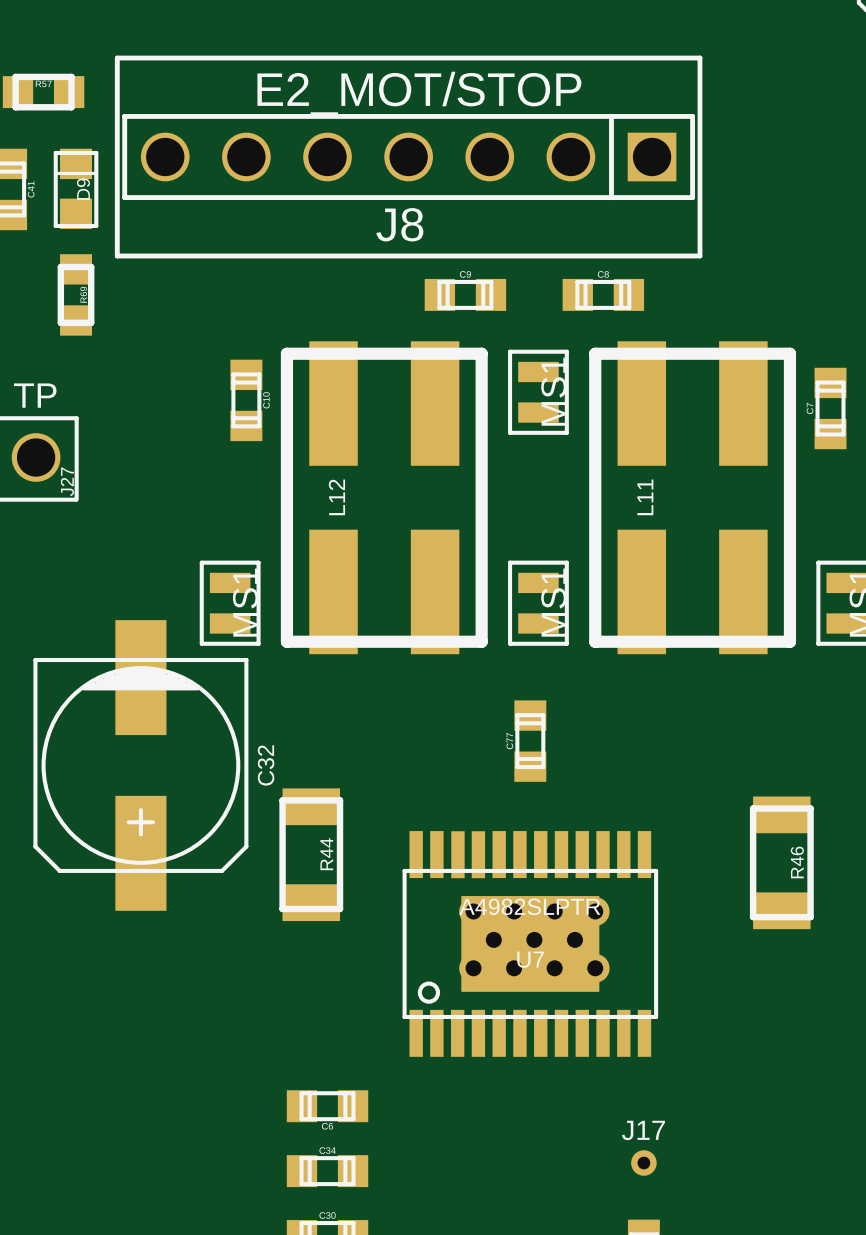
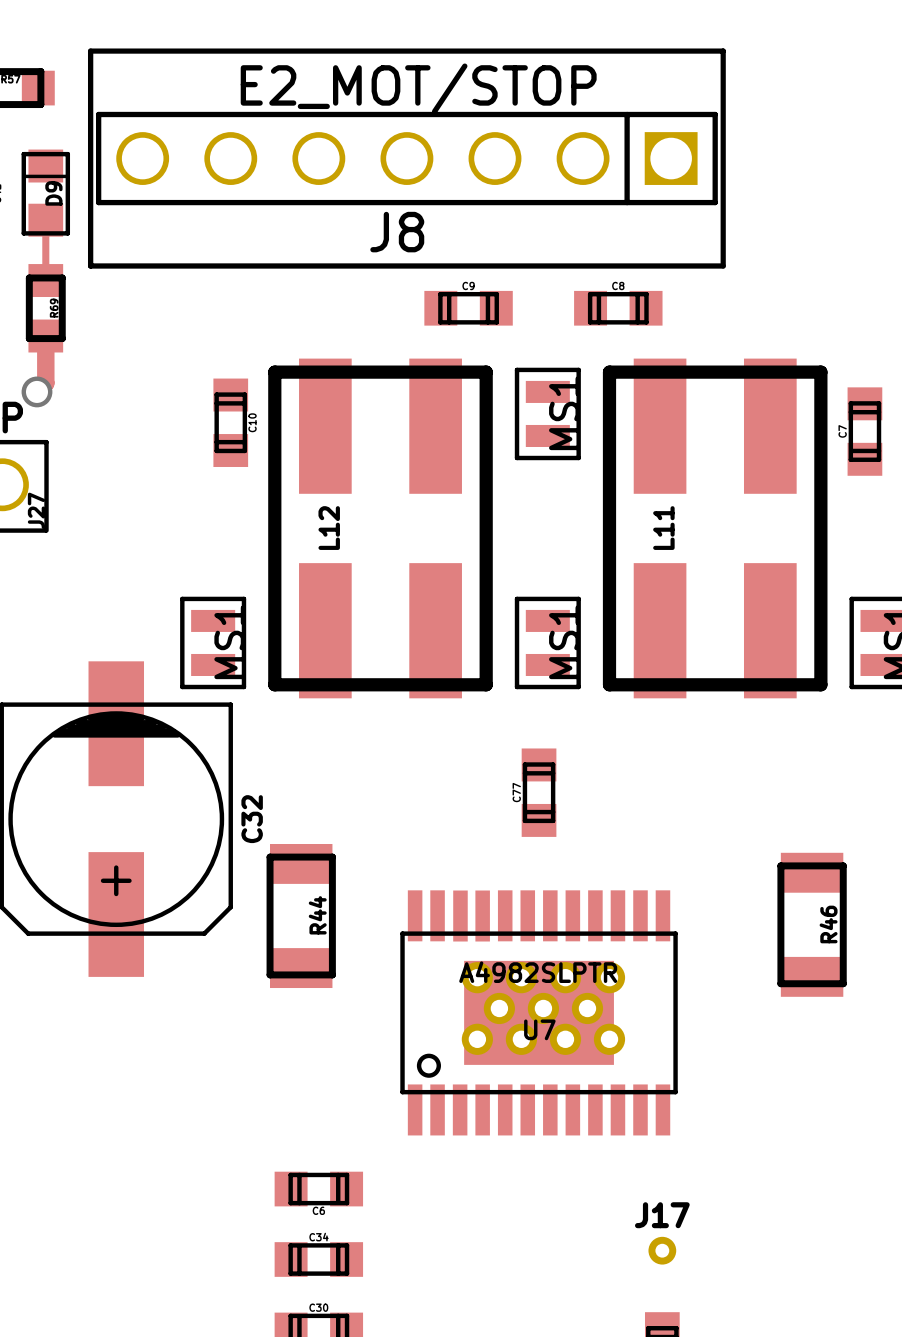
track: none -> (45, 220) (45, 280)
track: none -> (45, 336) (45, 383) (36, 391)
via: none -> (36, 391)

